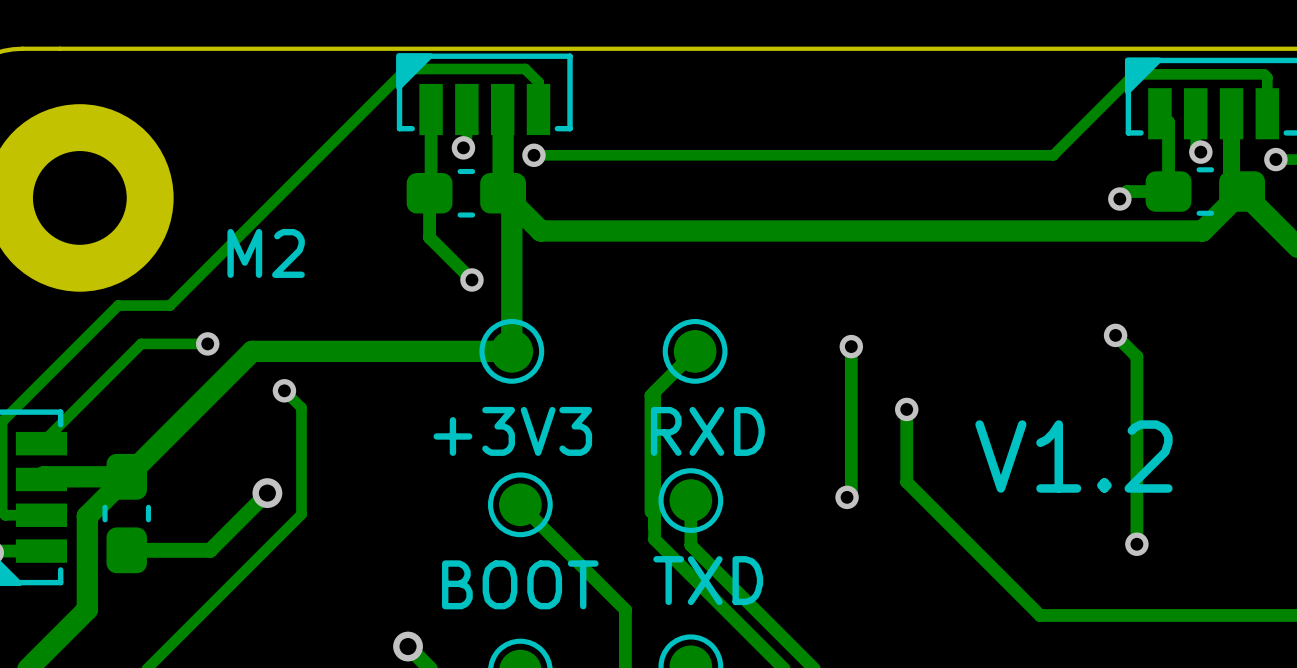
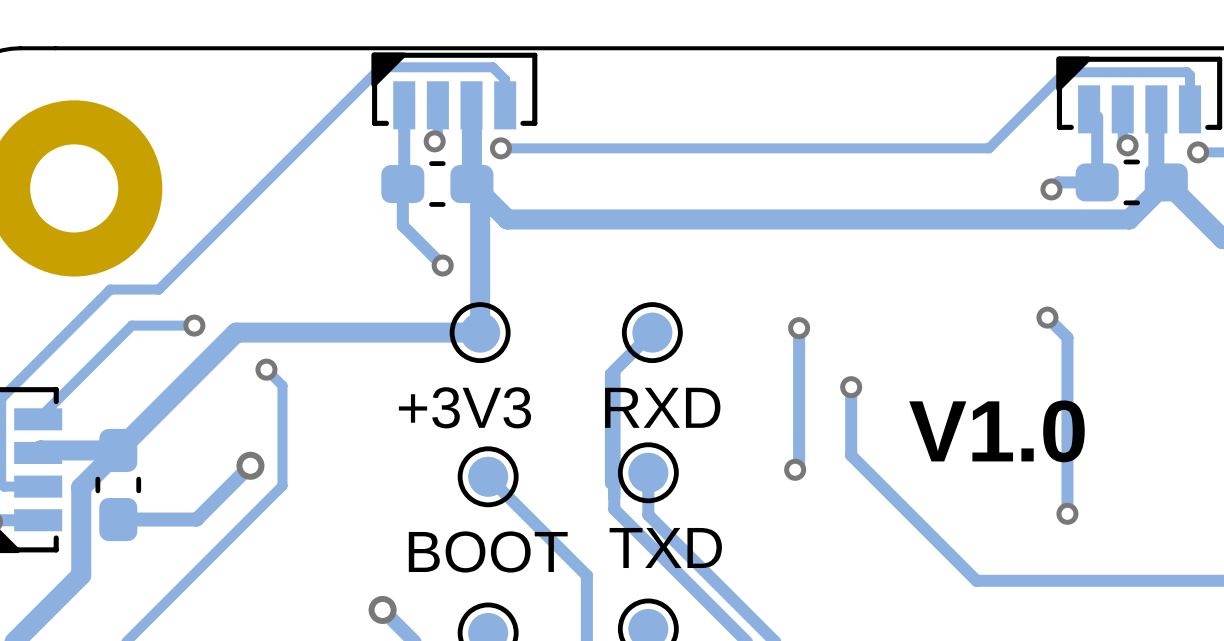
text: M2 (266, 253) -> none
text: V1.2 (1073, 456) -> V1.0 (996, 431)

